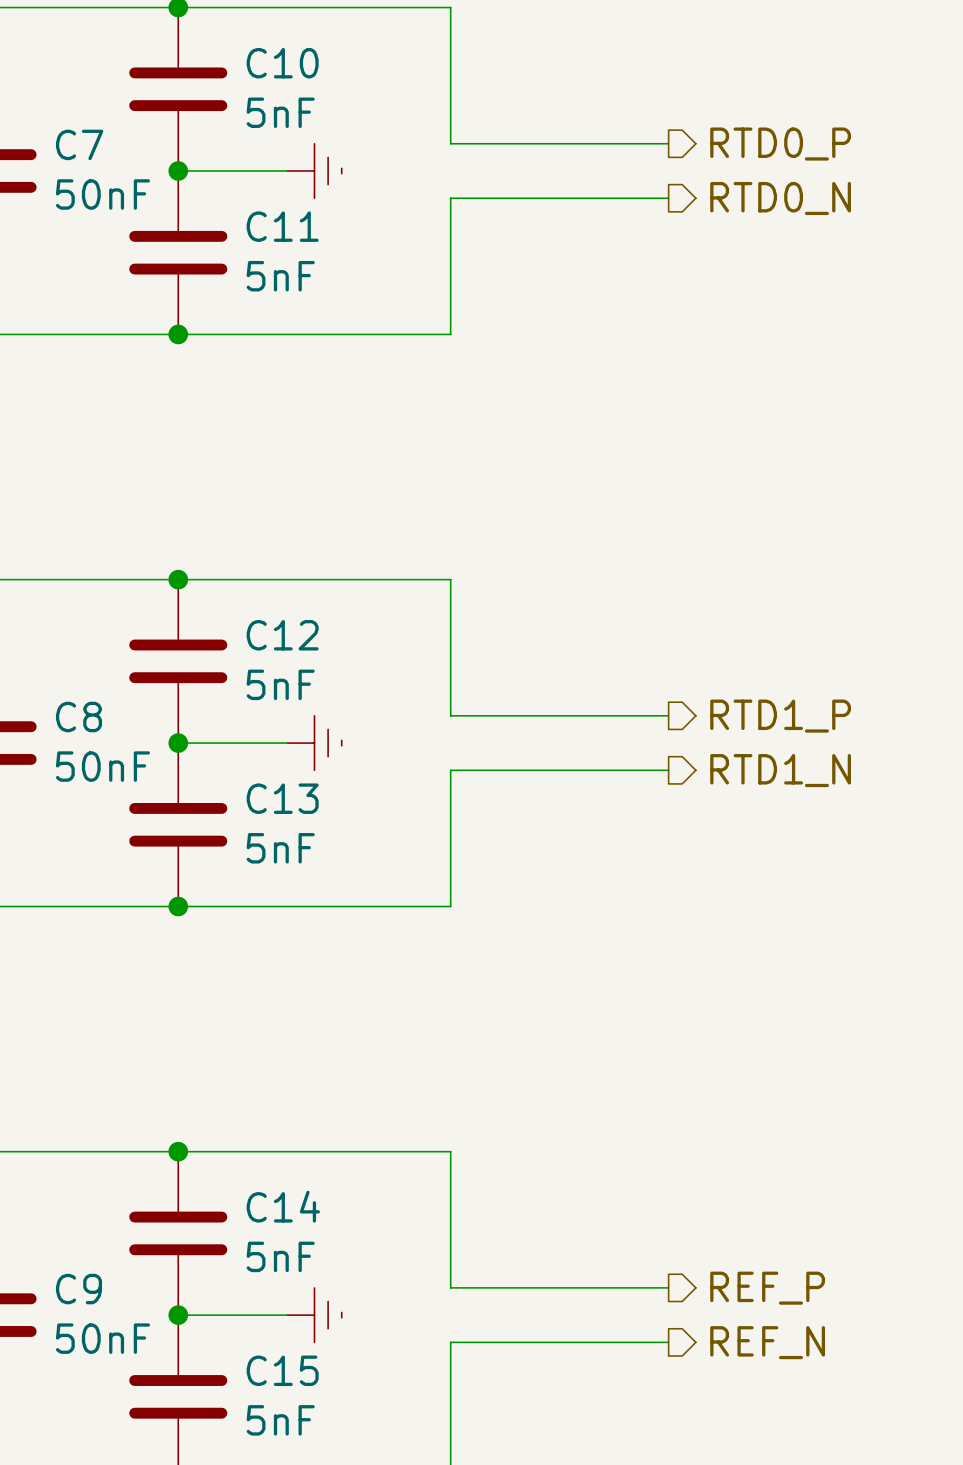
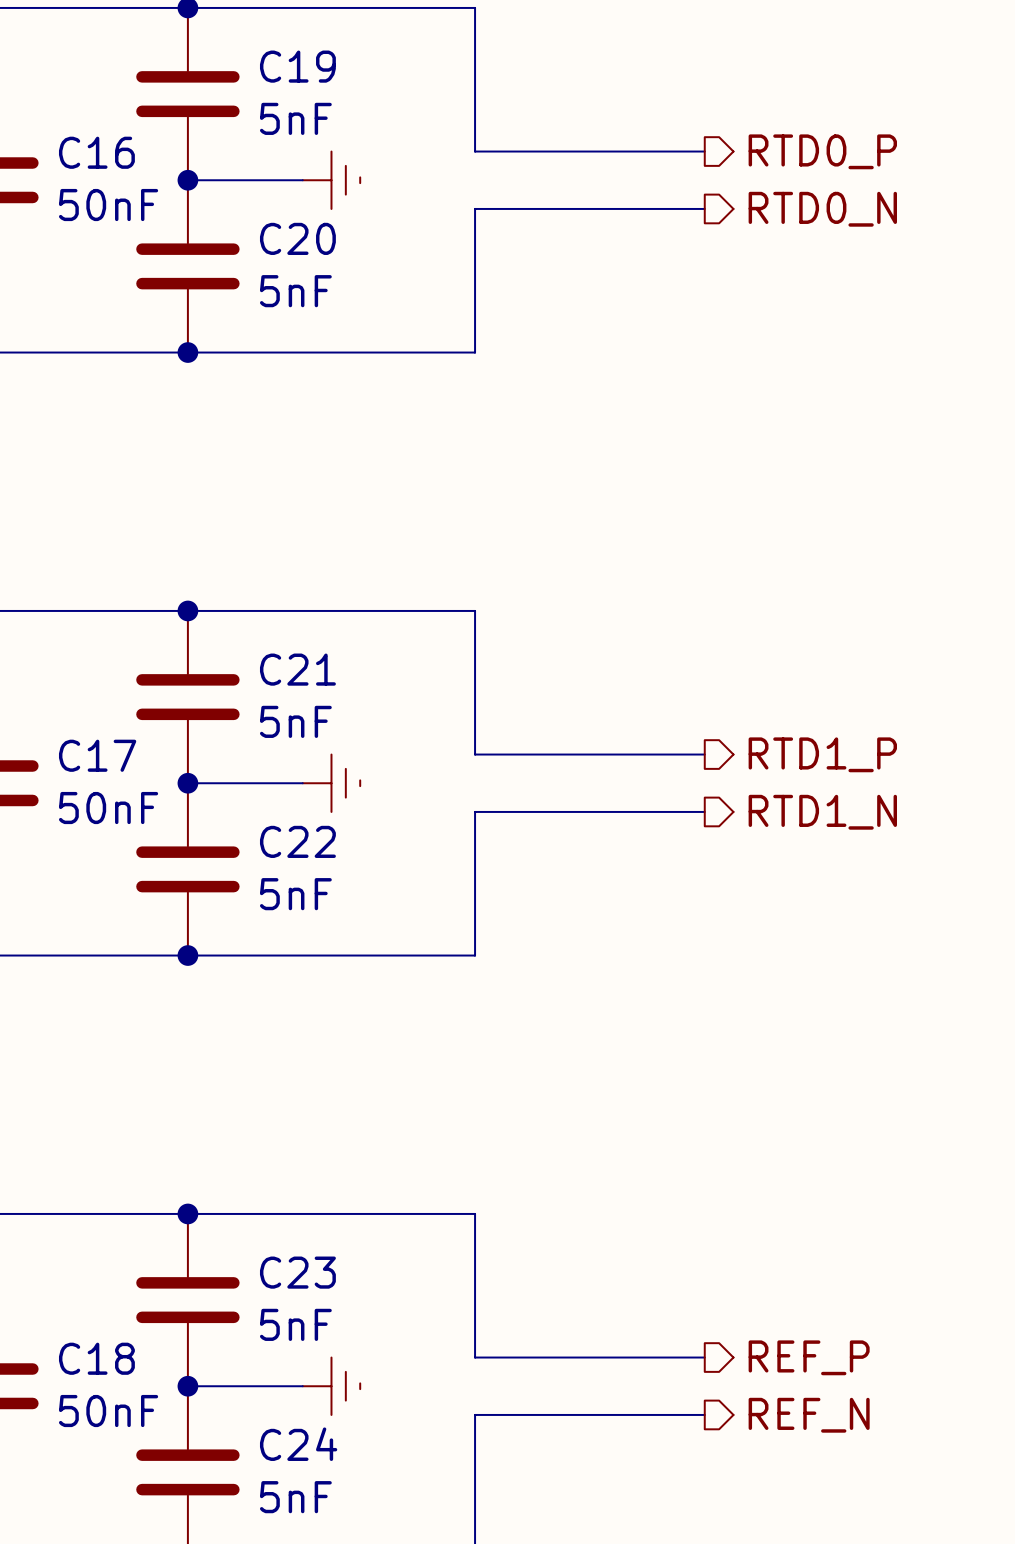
C10 name: C10 (282, 63) -> C19 (297, 66)
C7 name: C7 (79, 144) -> C16 (96, 152)
C11 name: C11 (282, 226) -> C20 (297, 238)
C12 name: C12 (282, 635) -> C21 (297, 669)
C8 name: C8 (78, 716) -> C17 (97, 755)
C13 name: C13 (282, 798) -> C22 (297, 841)
C14 name: C14 (283, 1206) -> C23 (297, 1272)
C9 name: C9 (78, 1289) -> C18 (96, 1358)
C15 name: C15 (282, 1370) -> C24 (298, 1444)

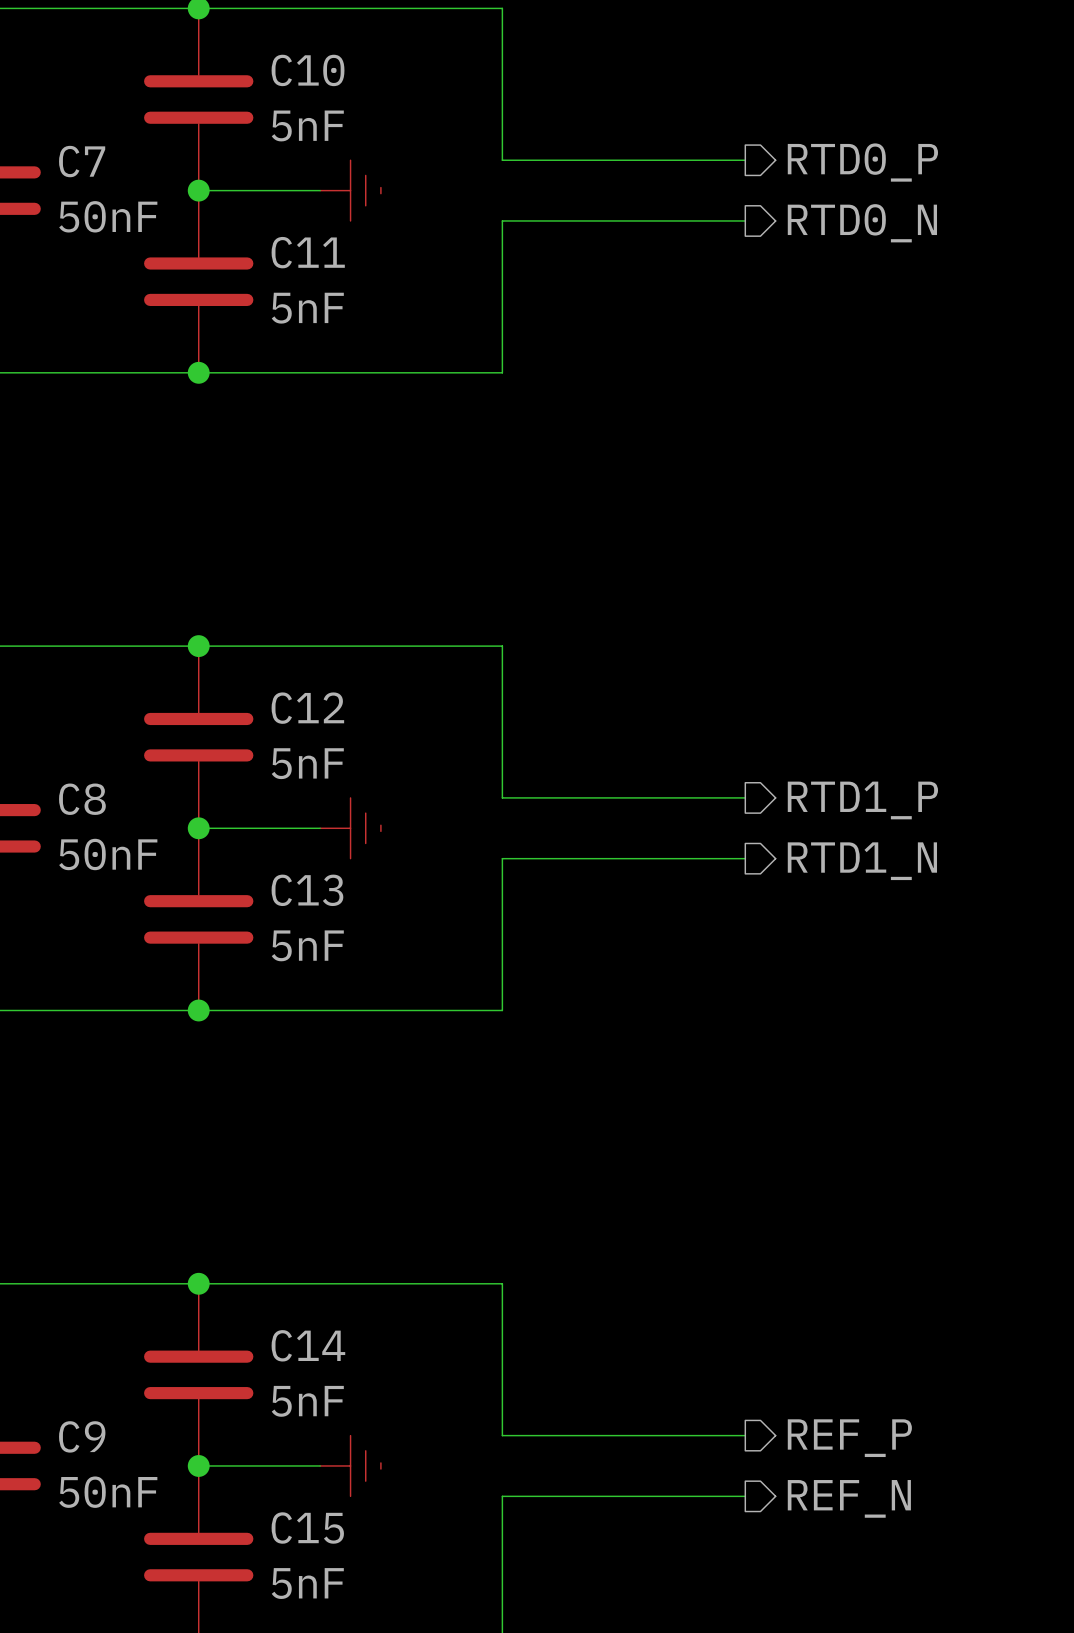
C19 name: C19 (297, 66) -> C10 (308, 70)
C16 name: C16 (96, 152) -> C7 (82, 161)
C20 name: C20 (297, 238) -> C11 (308, 252)
C21 name: C21 (297, 669) -> C12 (307, 708)
C17 name: C17 (97, 755) -> C8 (82, 799)
C22 name: C22 (297, 841) -> C13 (307, 890)
C23 name: C23 (297, 1272) -> C14 (308, 1345)
C18 name: C18 (96, 1358) -> C9 (82, 1436)
C24 name: C24 (298, 1444) -> C15 (307, 1528)

